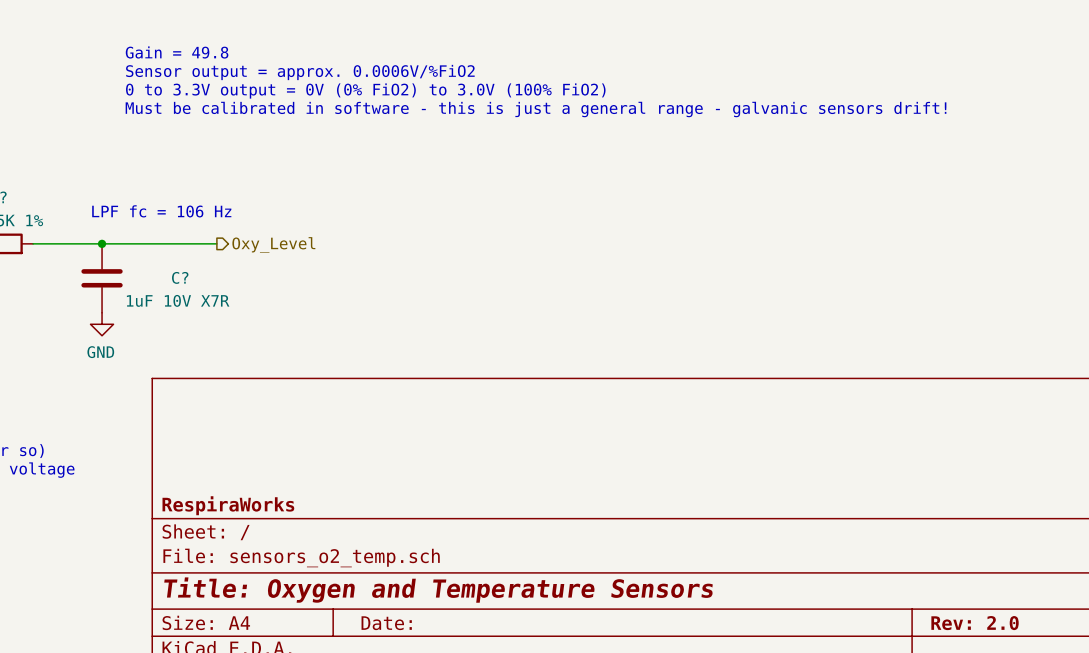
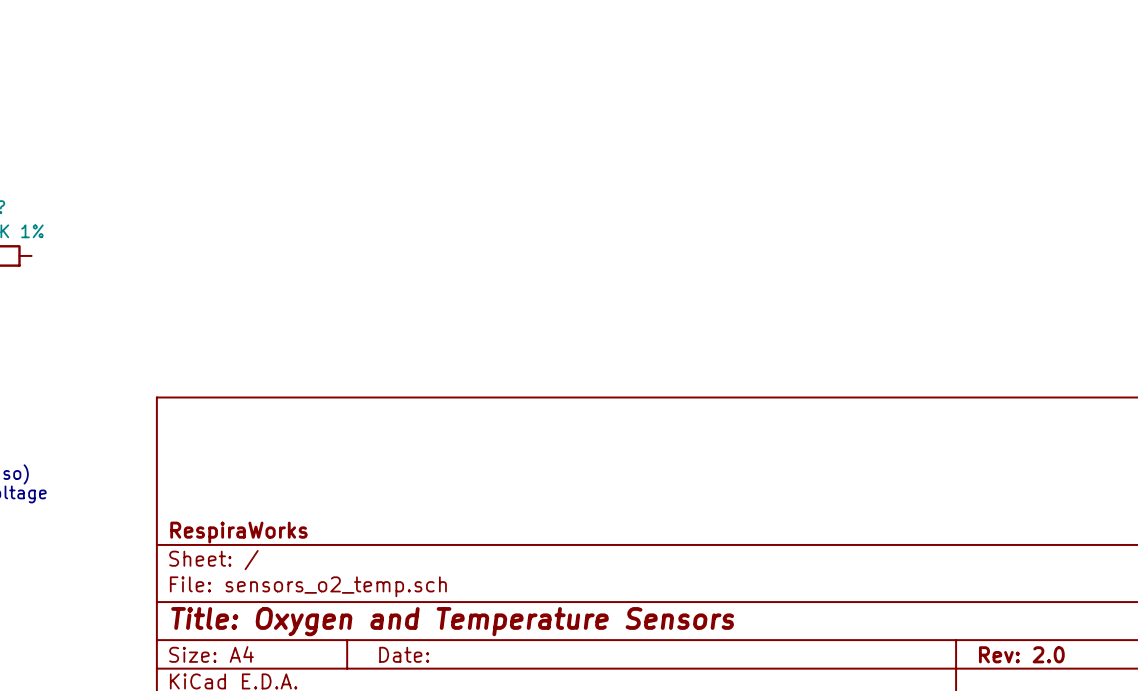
text: Gain = 49.8 (177, 52) -> none
text: Sensor output = approx. 0.0006V/%FiO2 (300, 72) -> none
text: 0 to 3.3V output = 0V (0% FiO2) to 3.0V (100% FiO2) (365, 90) -> none
text: Must be calibrated in software - this is just a general range - galvanic sensors drift! (536, 109) -> none
text: LPF fc = 106 Hz (161, 211) -> none
wire: (33, 243) (216, 243) -> none
junction: (102, 243) -> none
hierarchical label: Oxy_Level (273, 245) -> none
C?: 1uF 10V X7R (102, 278) -> none
power symbol: GND (102, 324) -> none

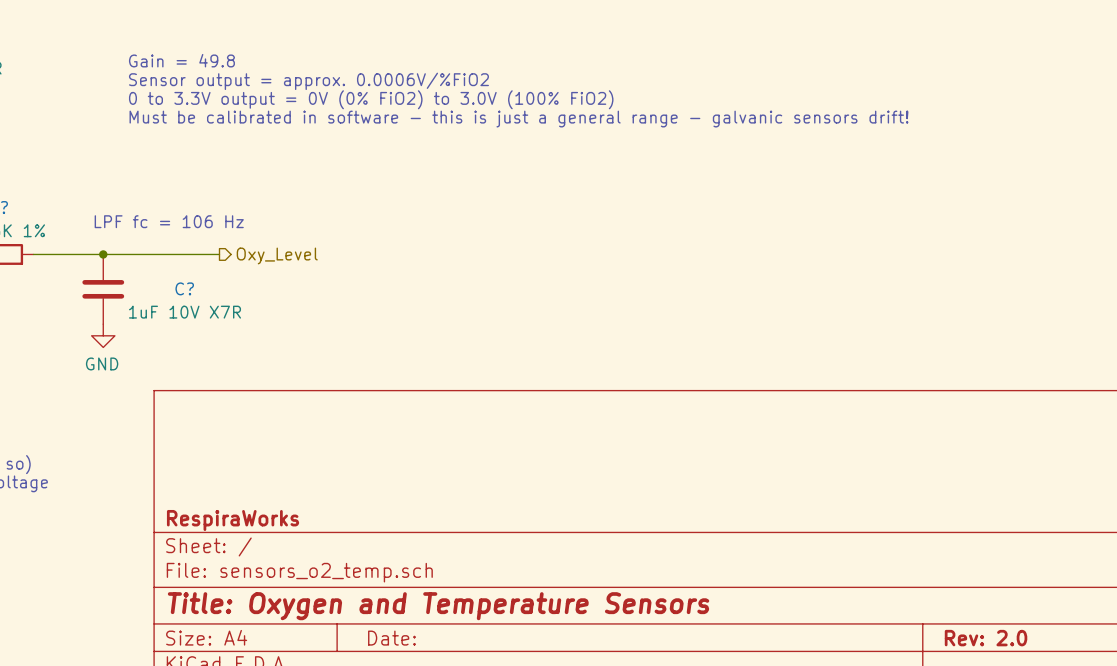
text: none -> Gain = 49.8 (181, 60)
text: none -> Sensor output = approx. 0.0006V/%FiO2 (308, 81)
text: none -> 0 to 3.3V output = 0V (0% FiO2) to 3.0V (100% FiO2) (371, 99)
text: none -> Must be calibrated in software - this is just a general range - galvanic sensors drift! (518, 119)
text: none -> LPF fc = 106 Hz (169, 221)
wire: none -> (33, 254) (219, 254)
junction: none -> (103, 254)
hierarchical label: none -> Oxy_Level (277, 255)
C?: none -> 1uF 10V X7R (103, 289)
power symbol: none -> GND (103, 335)

